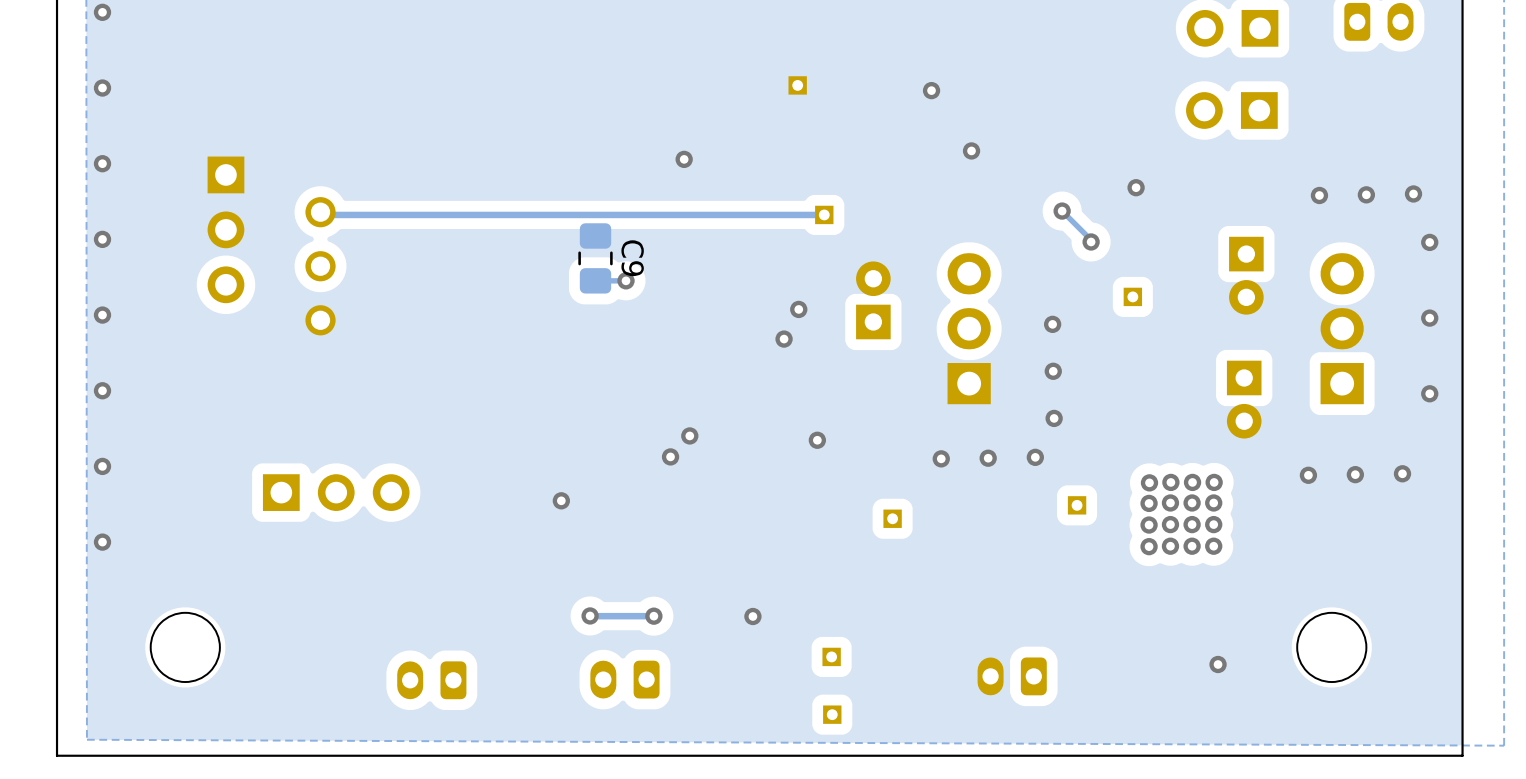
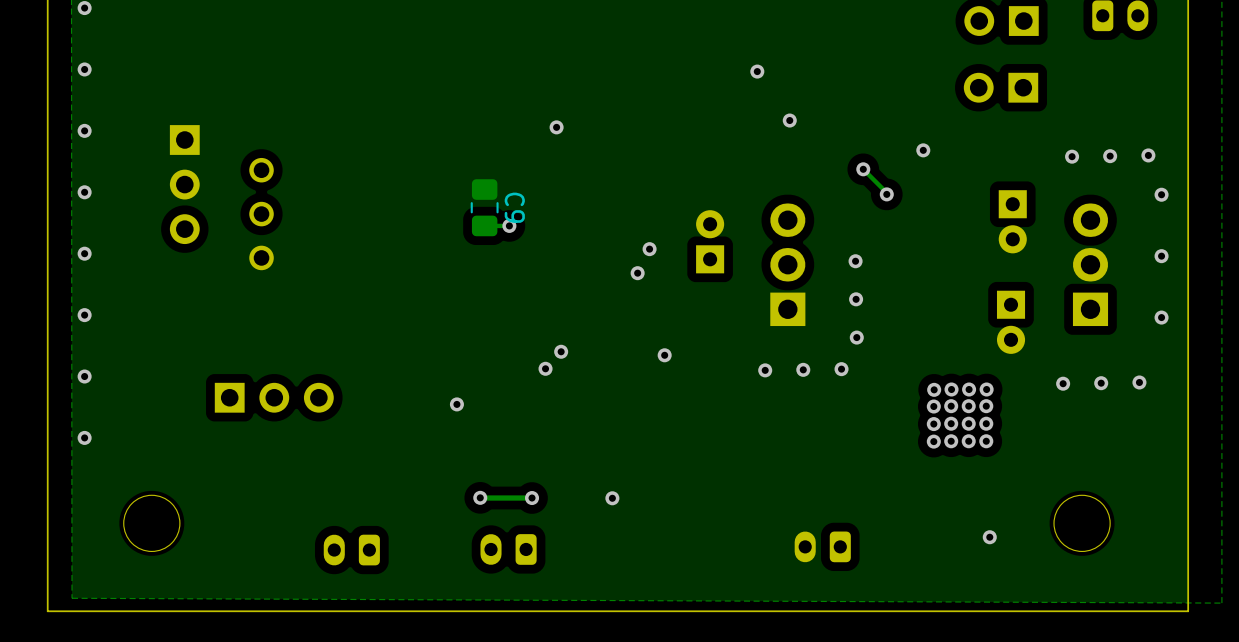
part: (797, 85) -> none
track: (320, 212) (323, 214) (824, 214) -> none
part: (824, 214) -> none
part: (1132, 296) -> none
part: (1077, 505) -> none
part: (892, 518) -> none
part: (831, 656) -> none
part: (832, 714) -> none

